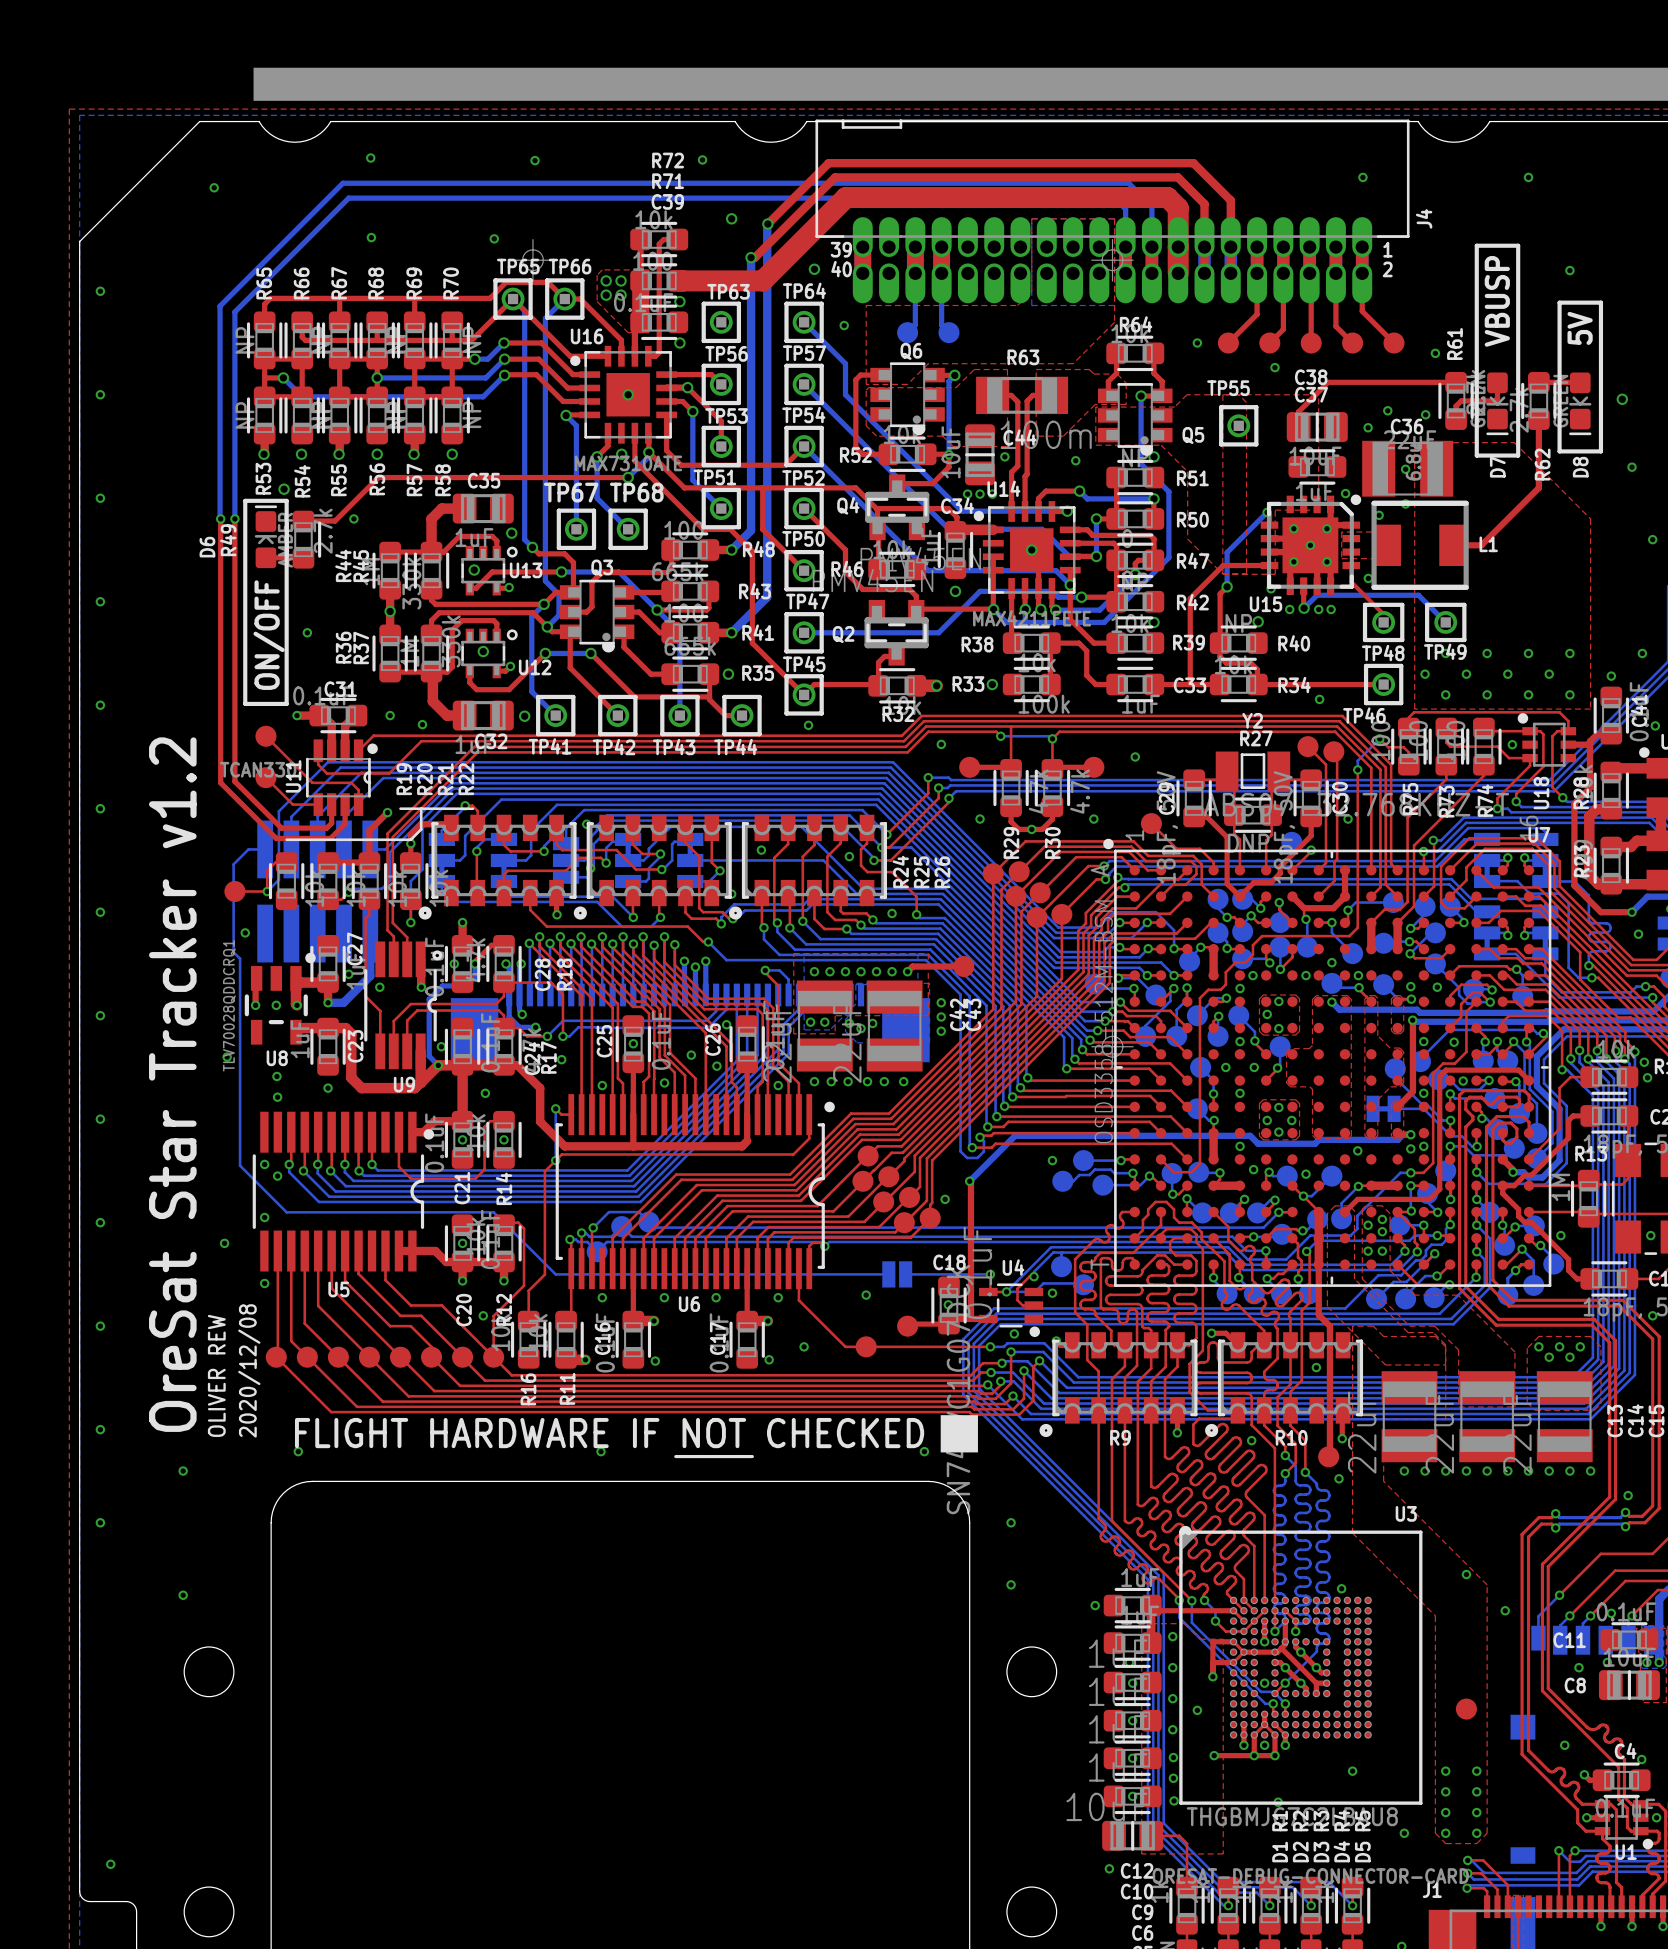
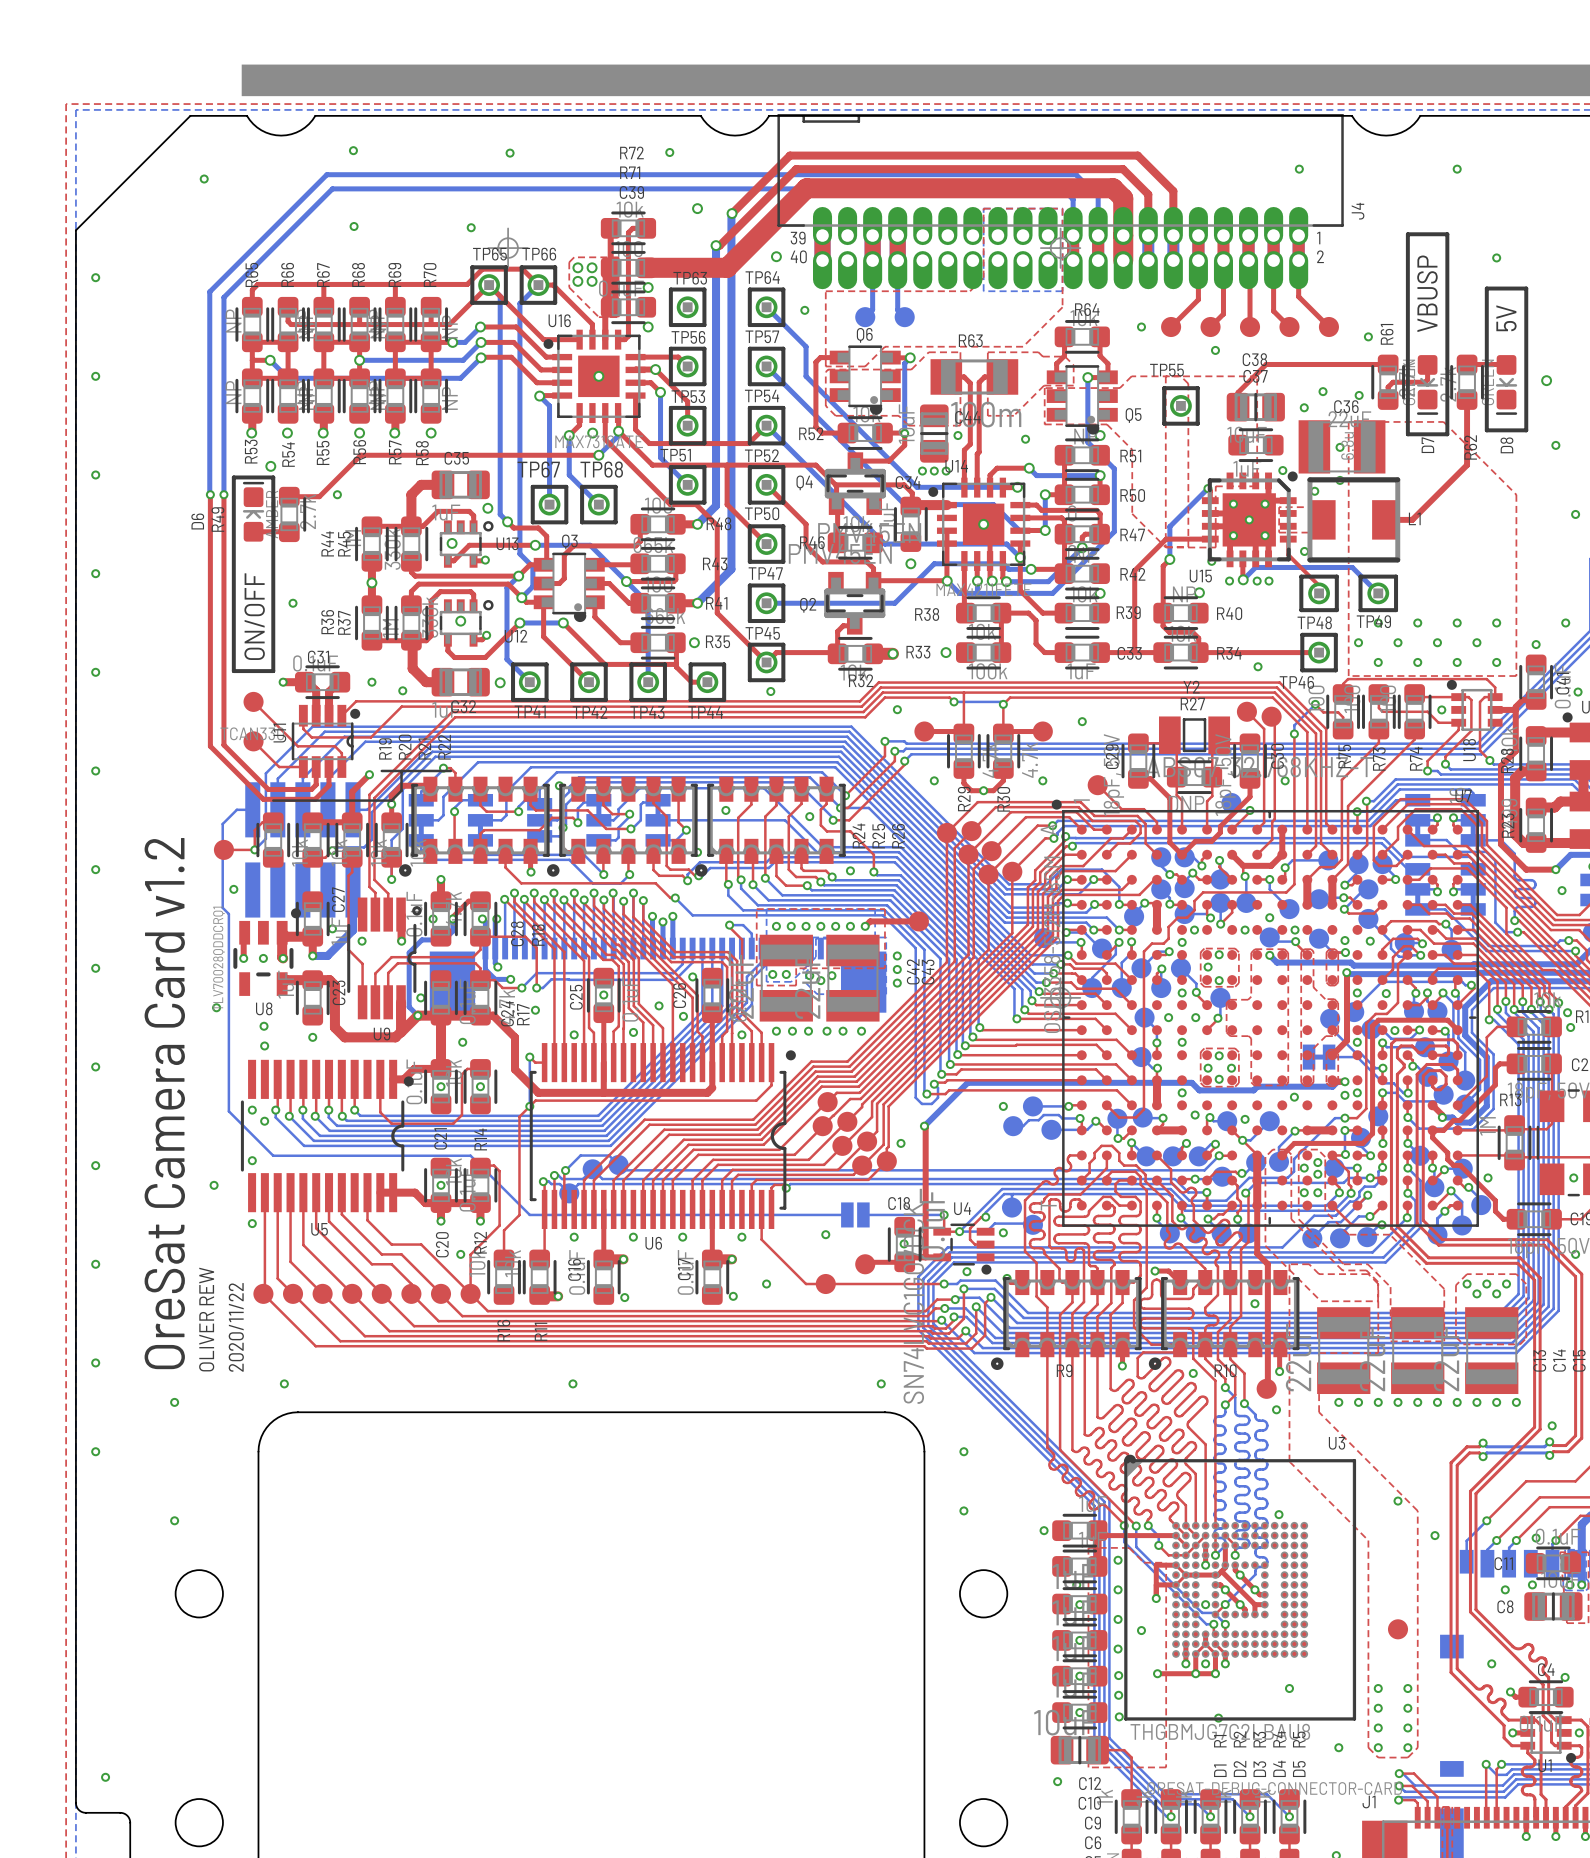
text: OreSat Star Tracker v1.2 (172, 1084) -> OreSat Camera Card v1.2 (164, 1103)
text: 2020/12/08 (249, 1370) -> 2020/11/22 (236, 1327)
drawing: [674, 1415, 978, 1459] -> none

